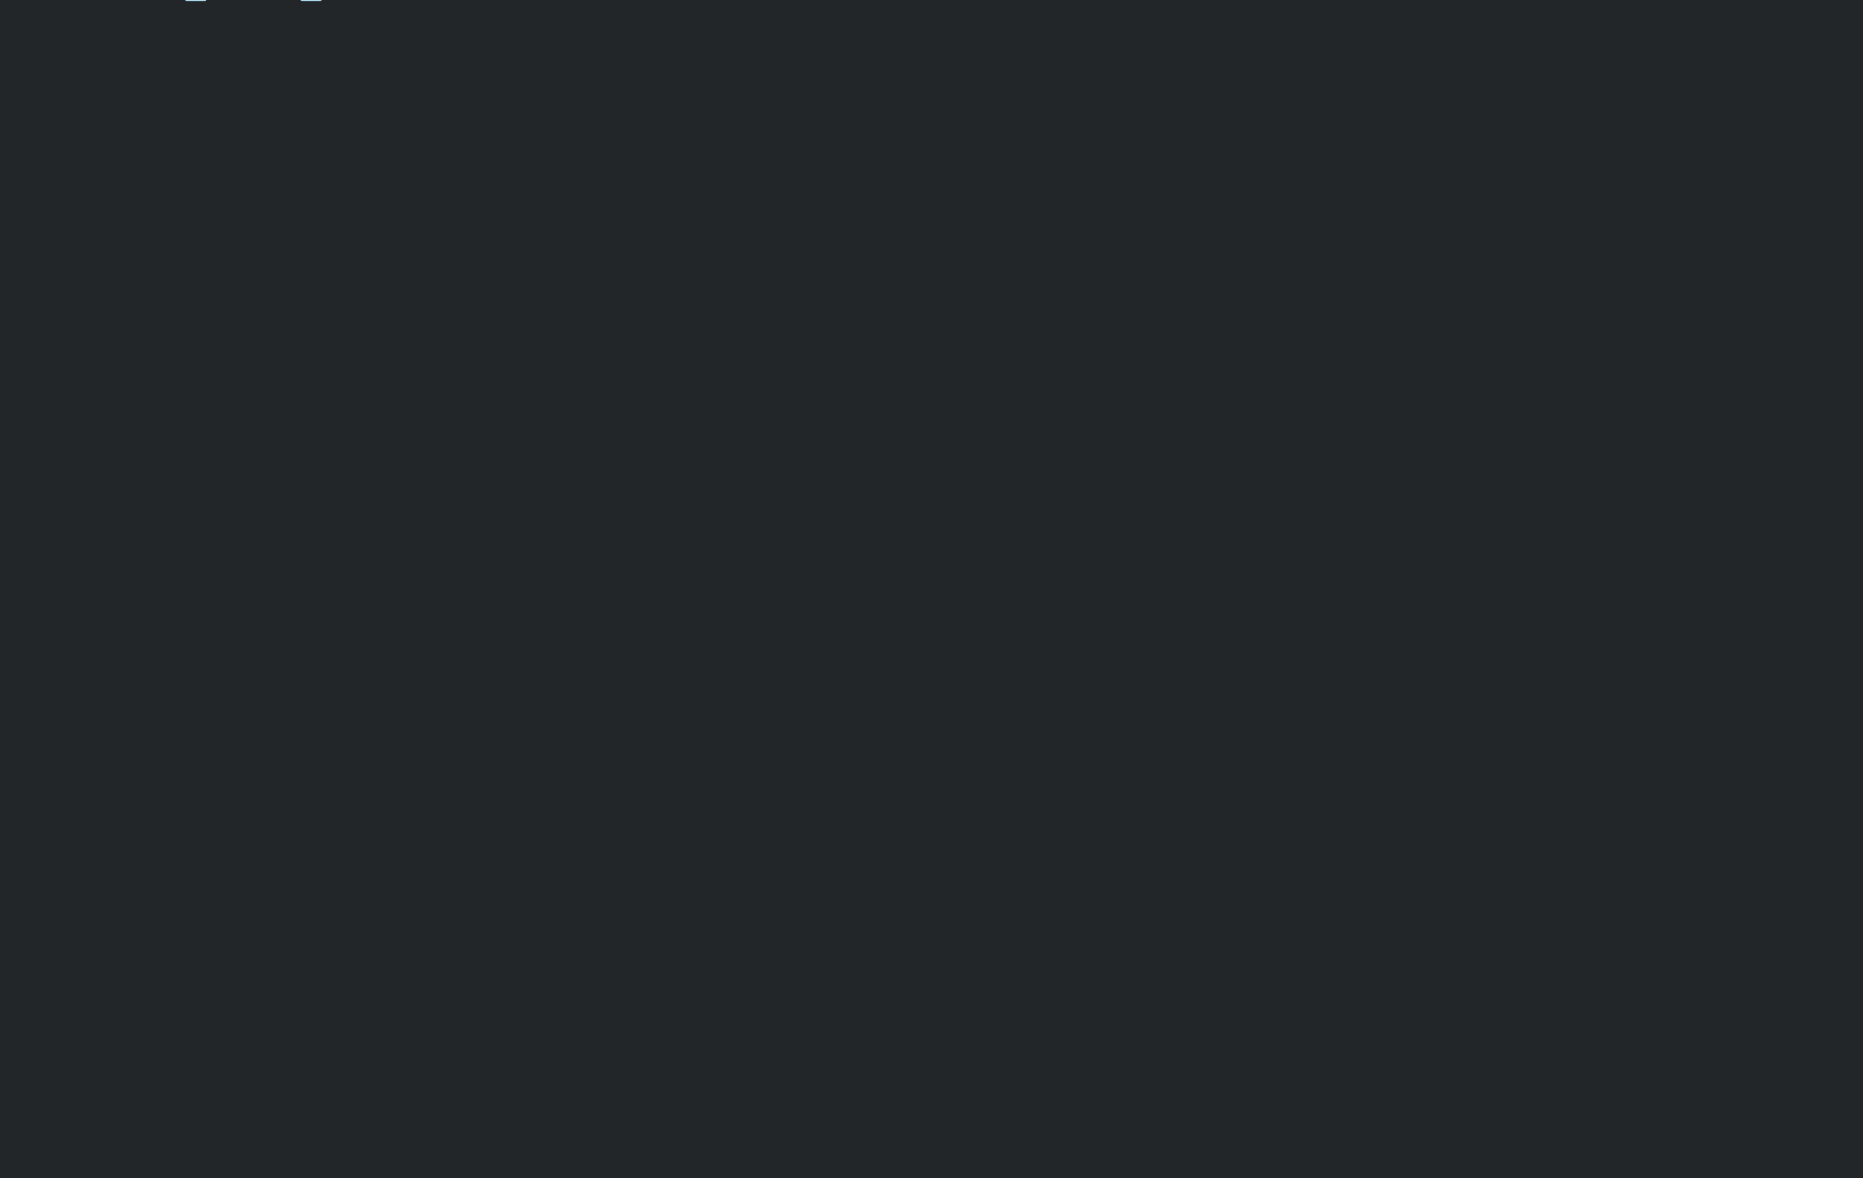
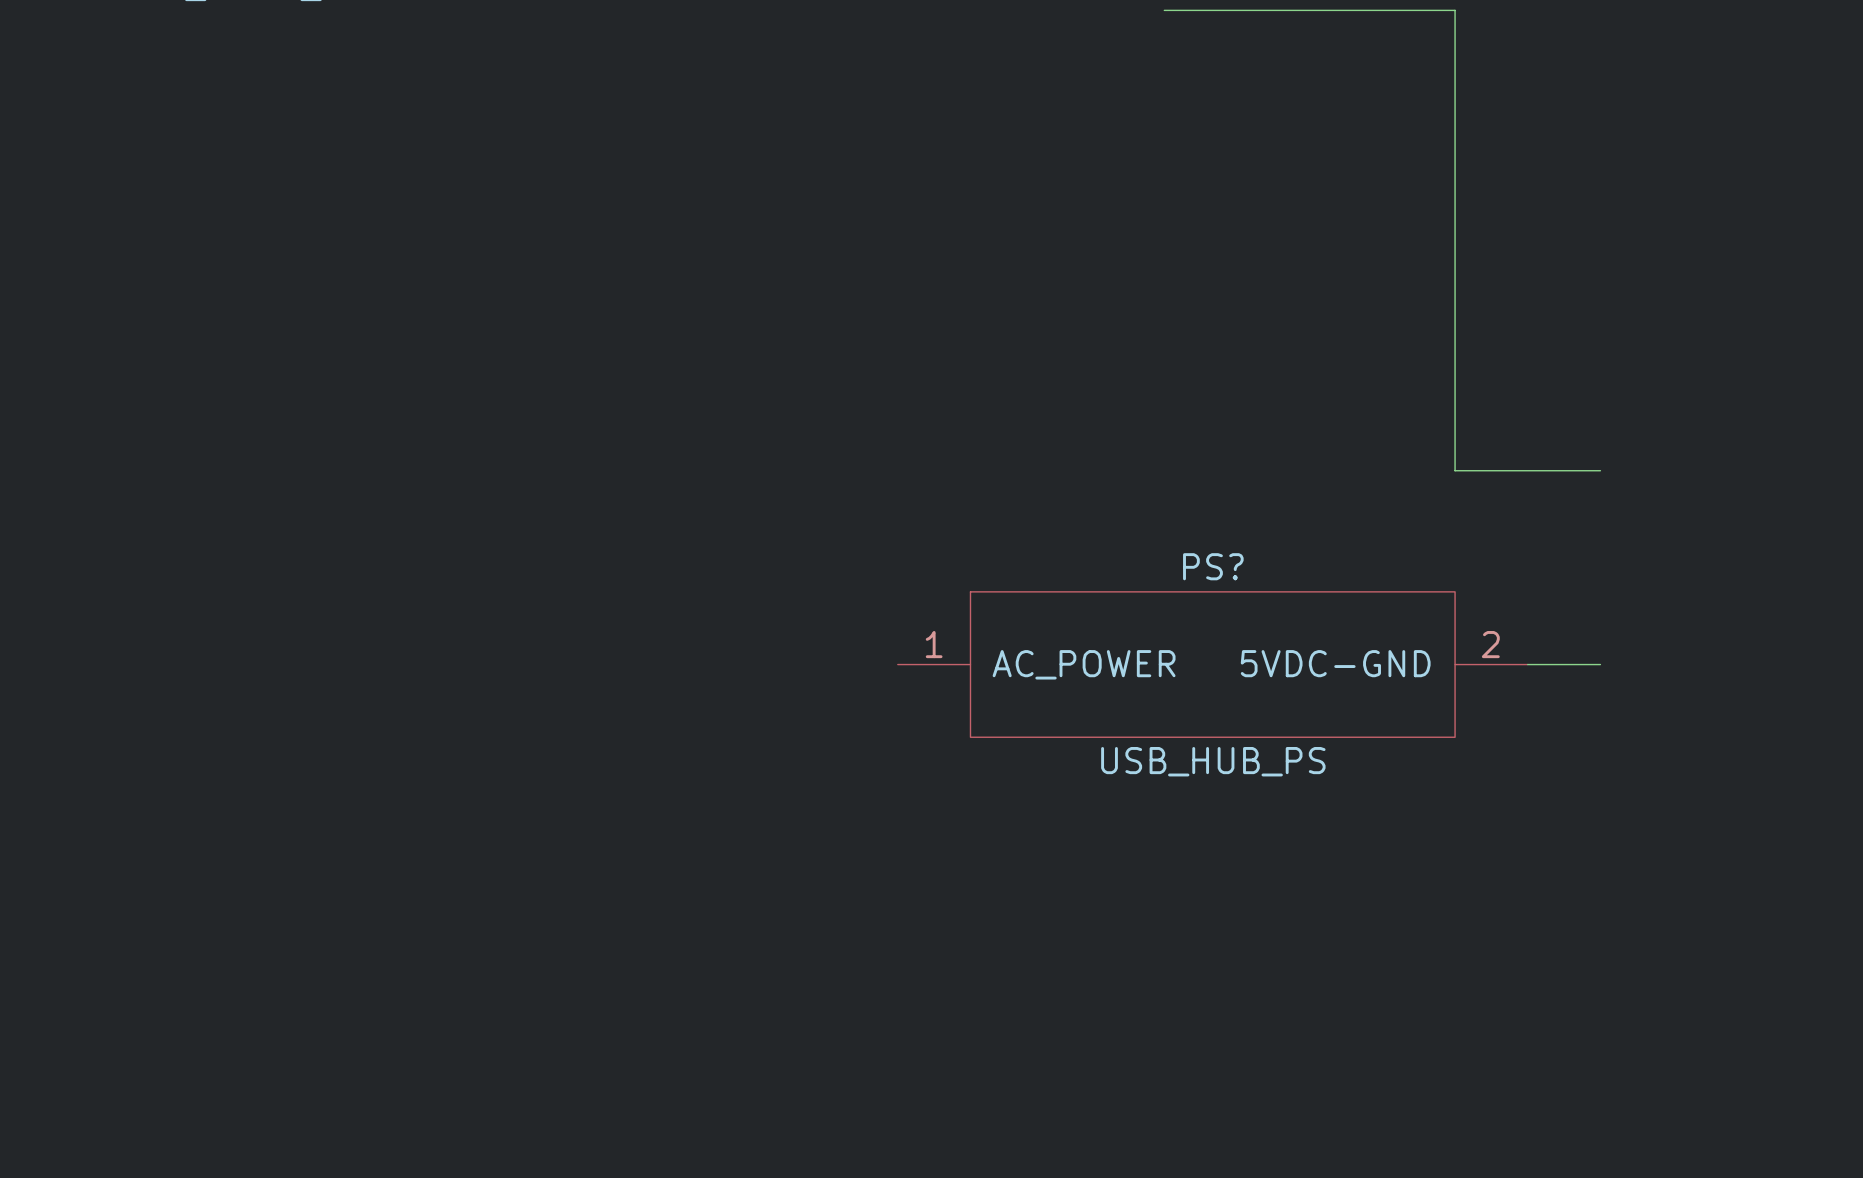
wire: none -> (1164, 10) (1455, 10) (1455, 470) (1600, 470)
PS?: none -> USB_HUB_PS (1212, 664)
wire: none -> (1527, 664) (1600, 664)

